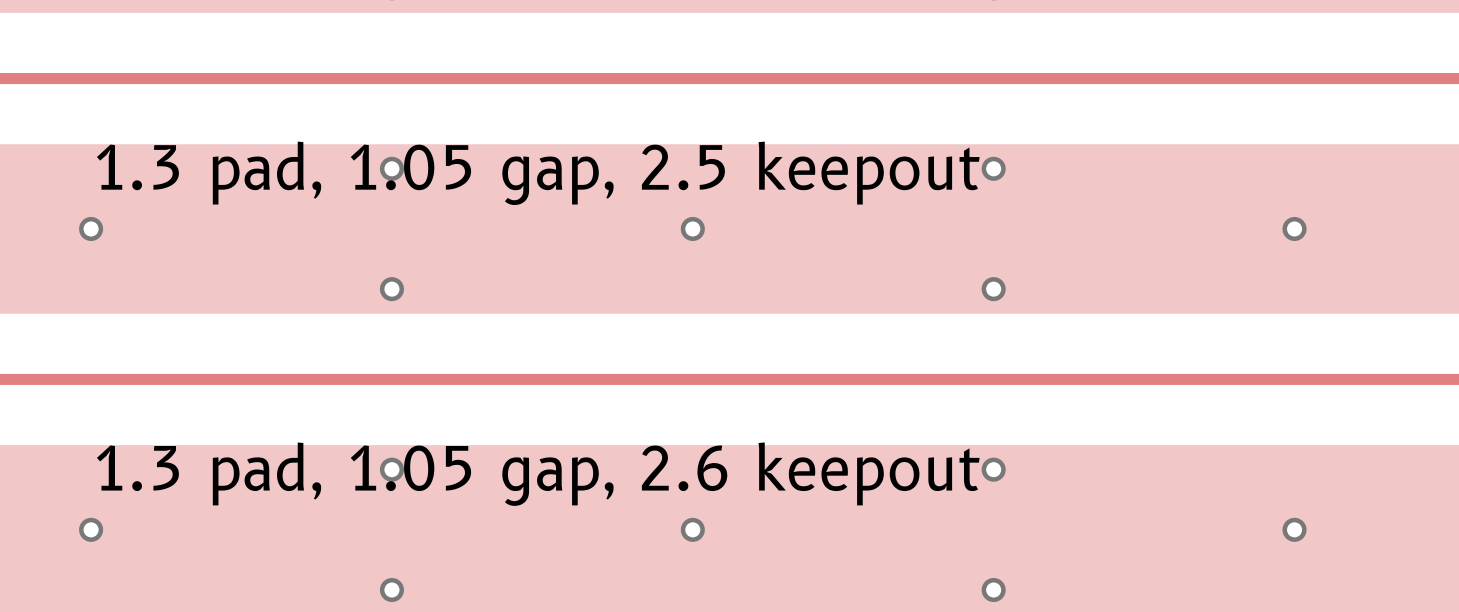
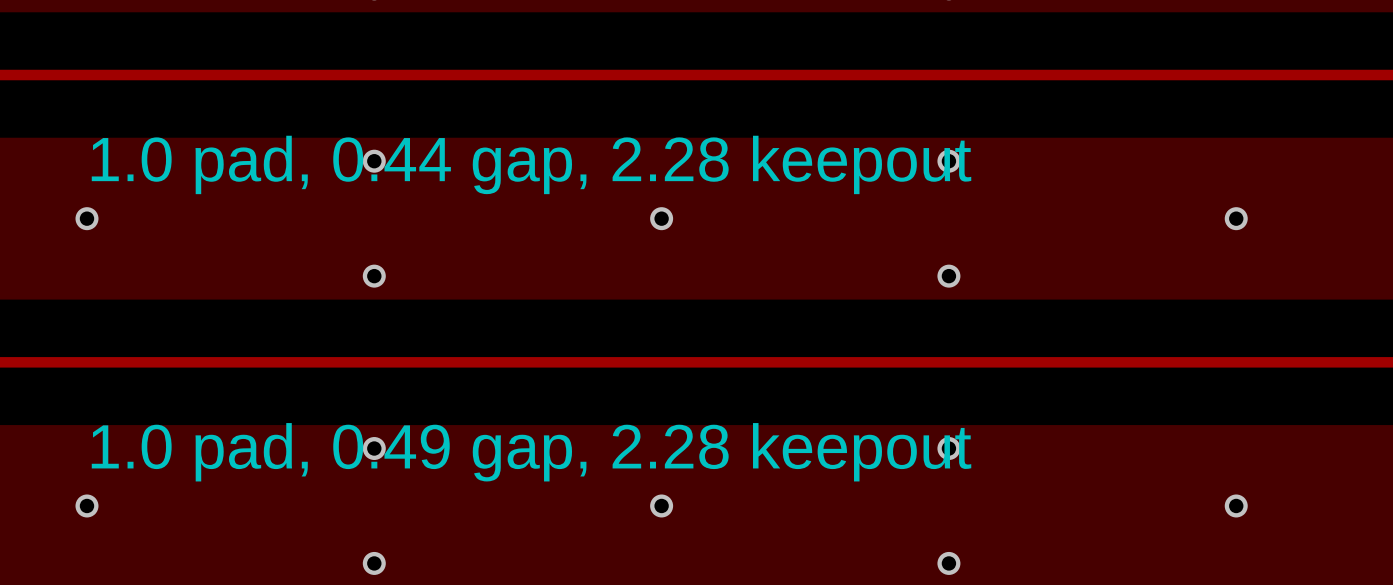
text: 1.3 pad, 1.05 gap, 2.5 keepout (538, 173) -> 1.0 pad, 0.44 gap, 2.28 keepout (531, 164)
text: 1.3 pad, 1.05 gap, 2.6 keepout (538, 474) -> 1.0 pad, 0.49 gap, 2.28 keepout (531, 452)

